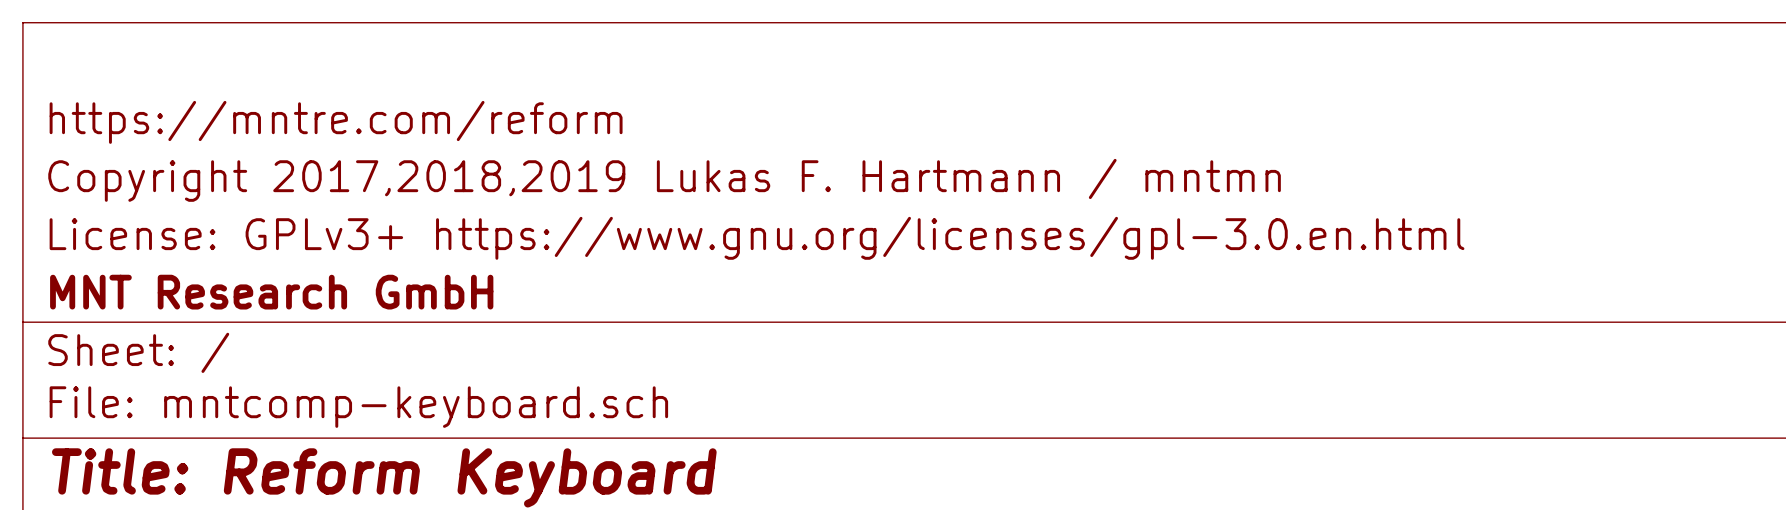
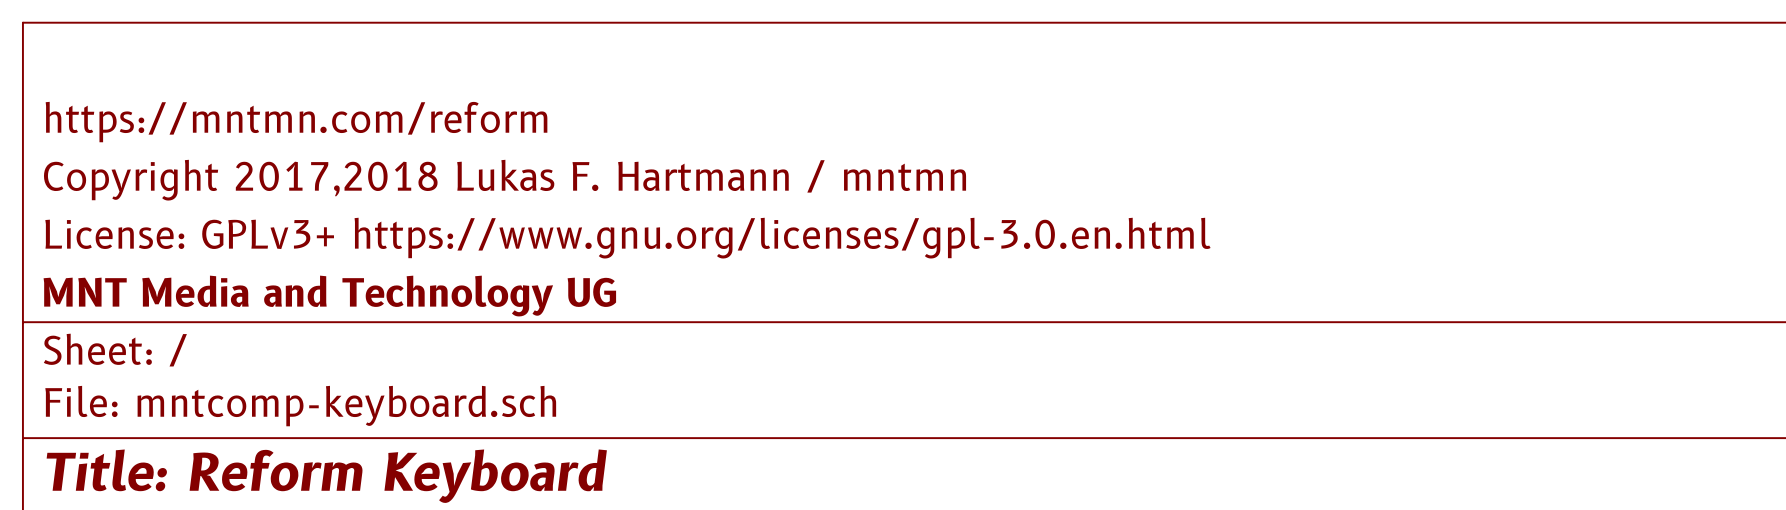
title block: https://mntre.com/reform (336, 122) -> https://mntmn.com/reform (296, 122)
title block: Copyright 2017,2018,2019 Lukas F. Hartmann / mntmn (664, 180) -> Copyright 2017,2018 Lukas F. Hartmann / mntmn (505, 180)
title block: MNT Research GmbH (271, 292) -> MNT Media and Technology UG (329, 296)

